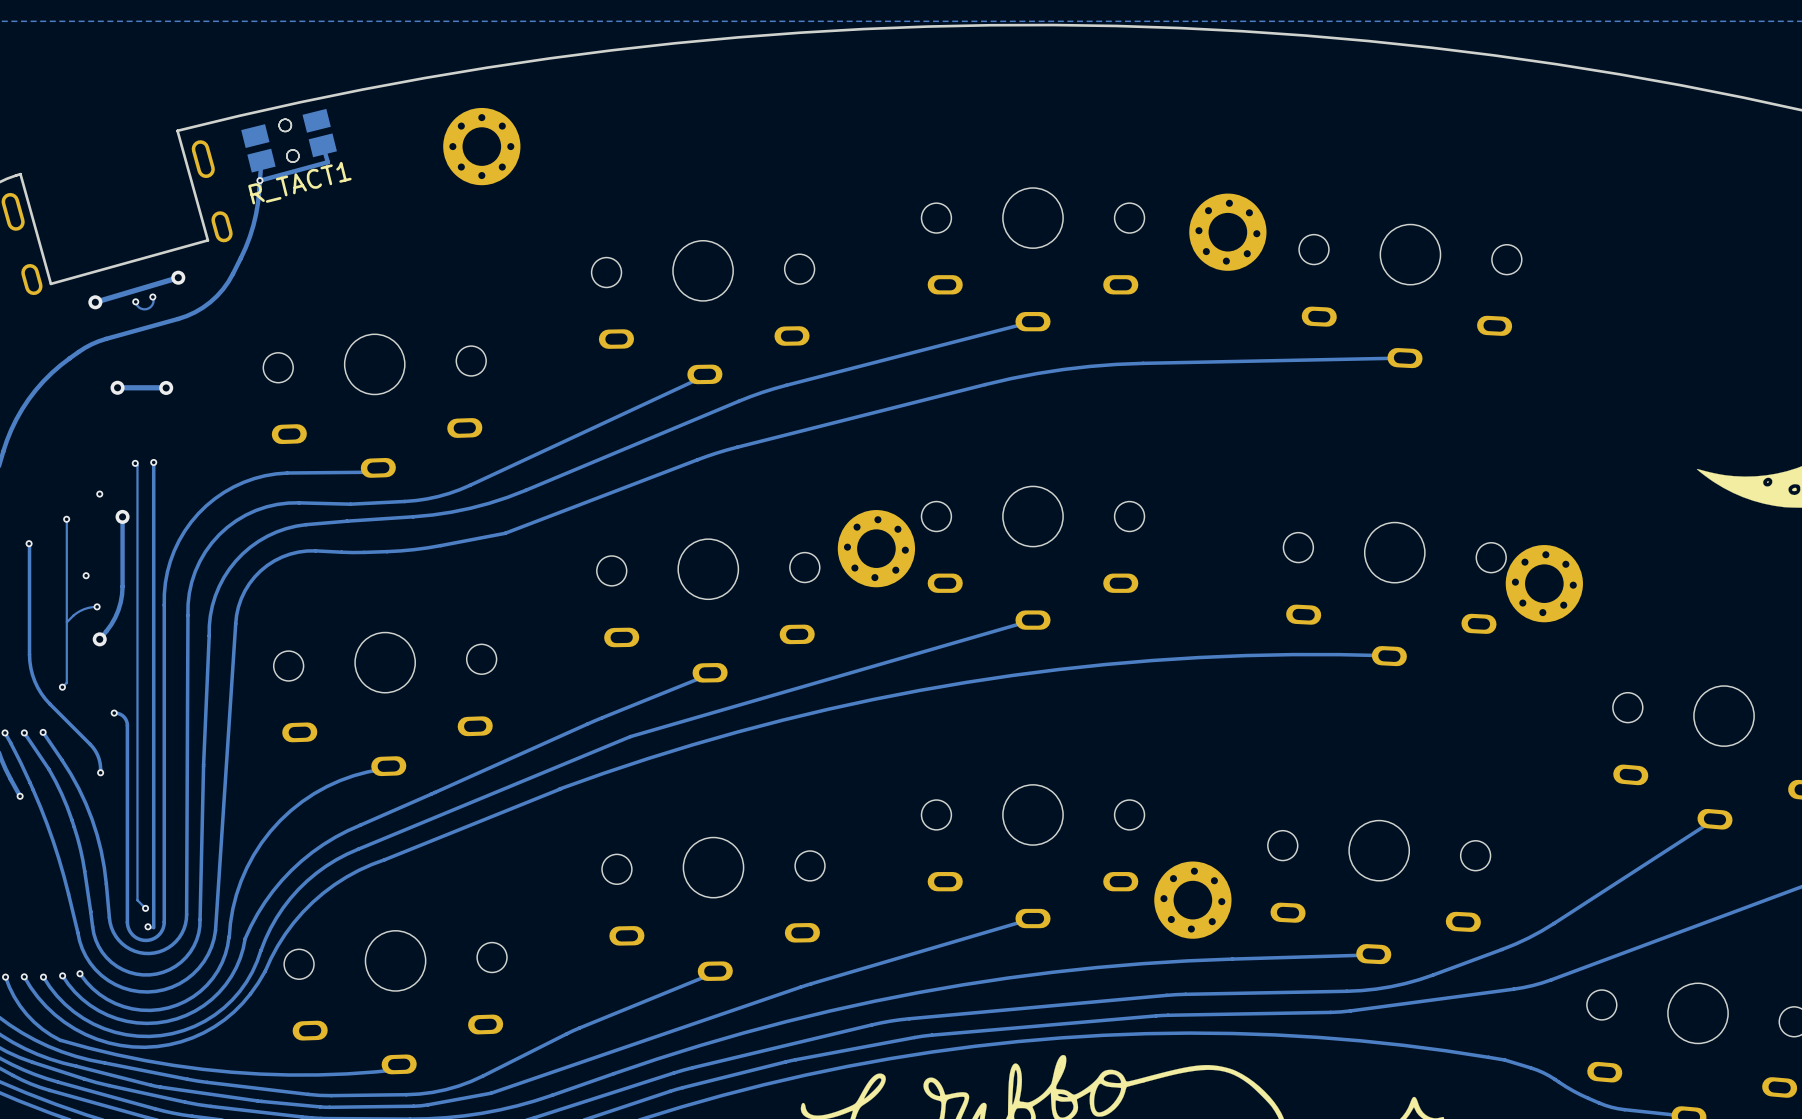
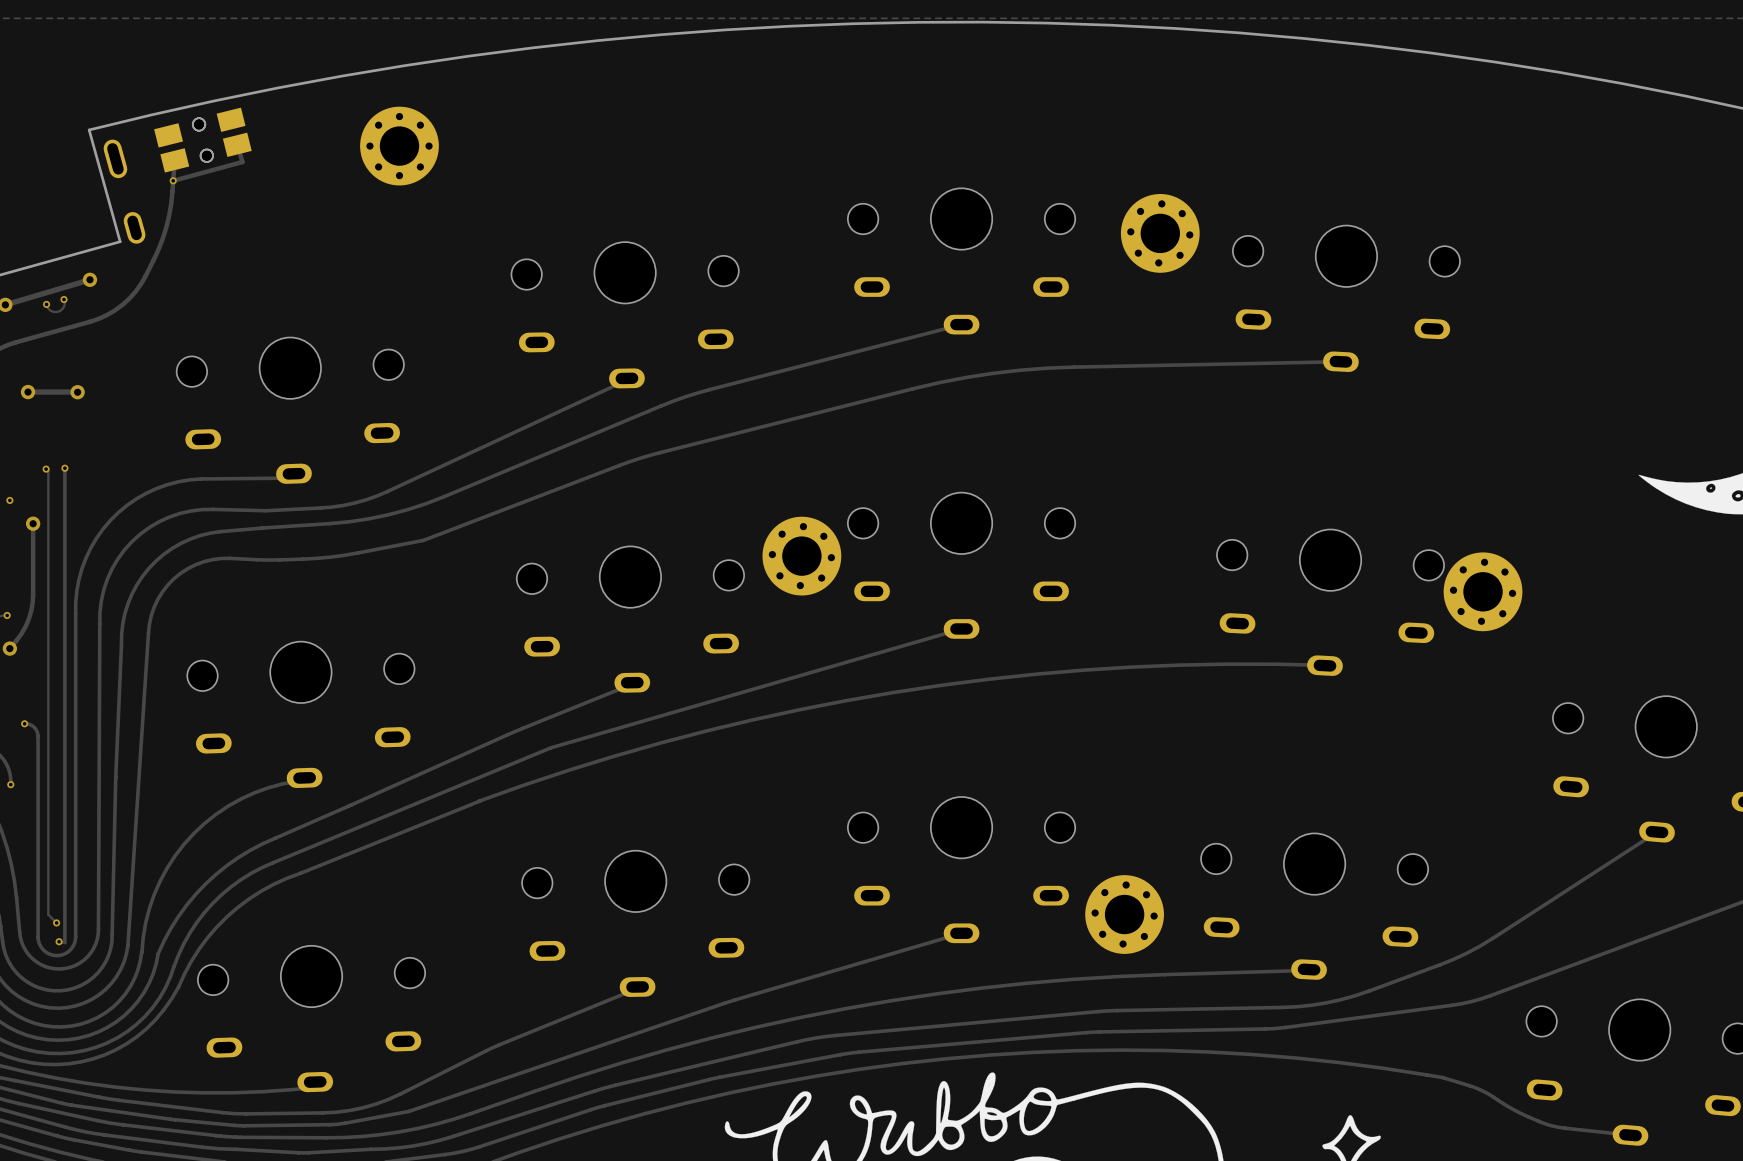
R_TACT1 name: R_TACT1 (299, 183) -> none

